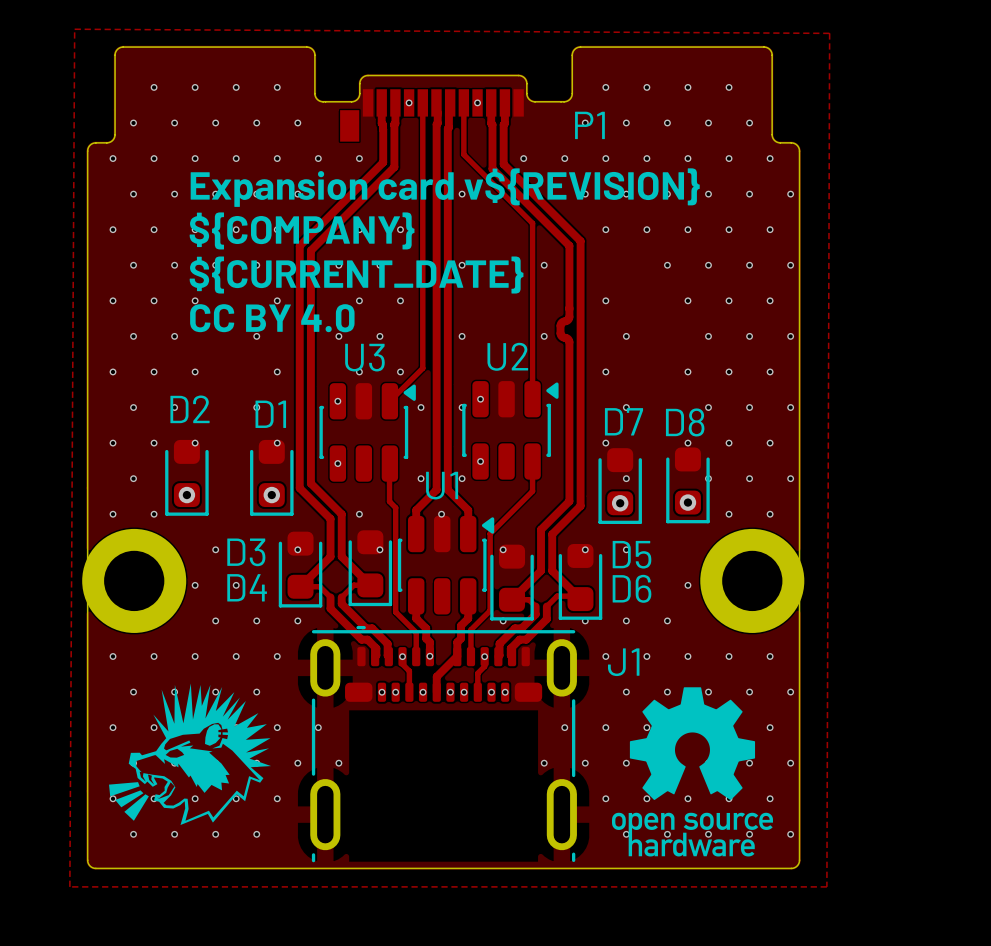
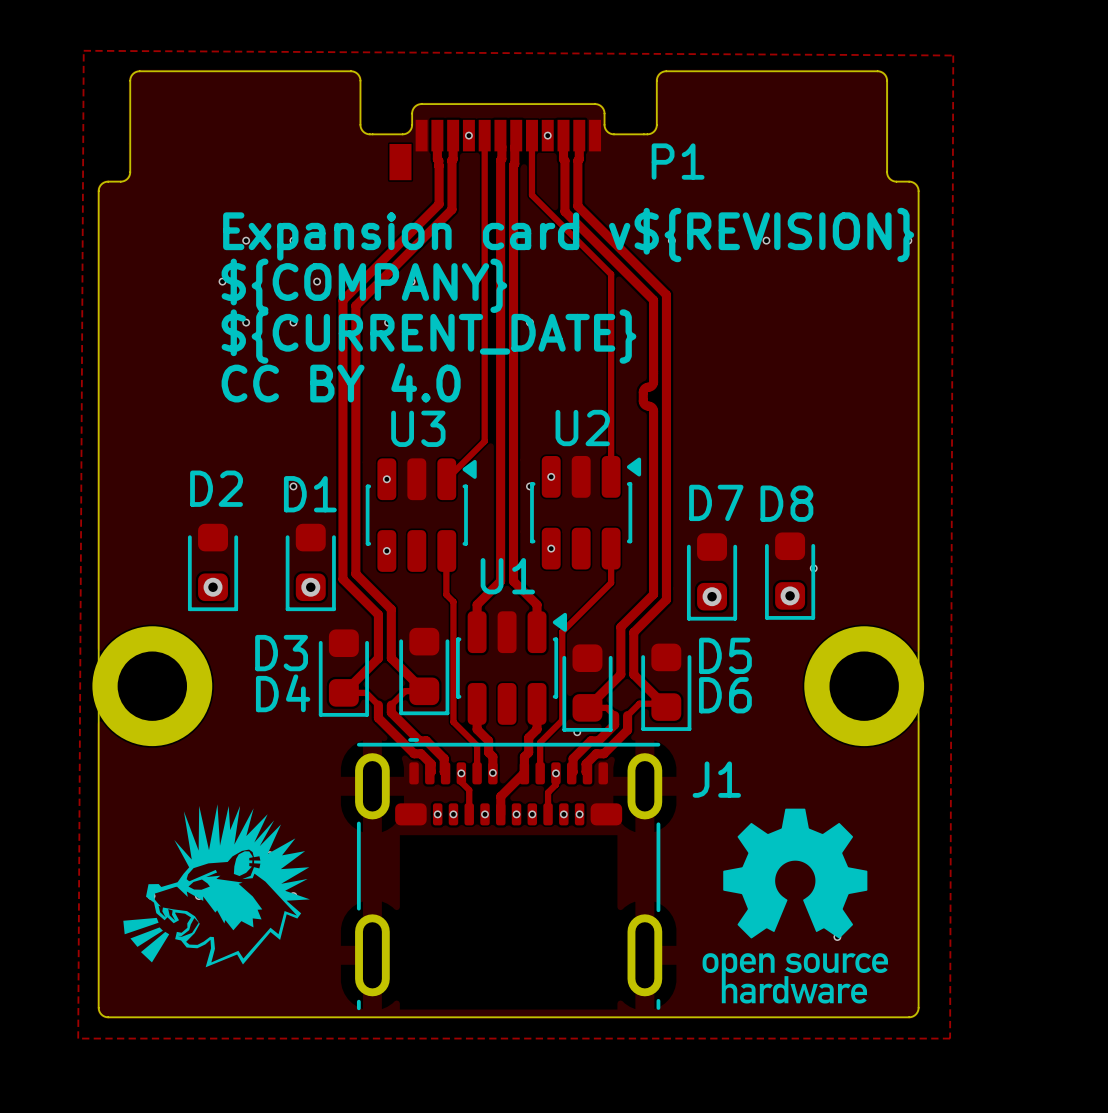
via: (154, 87) -> none
via: (195, 87) -> none
via: (236, 87) -> none
via: (277, 87) -> none
via: (605, 87) -> none
via: (646, 87) -> none
via: (687, 87) -> none
via: (729, 87) -> none
via: (133, 122) -> none
via: (174, 122) -> none
via: (215, 122) -> none
via: (256, 122) -> none
via: (297, 122) -> none
via: (585, 122) -> none
via: (626, 122) -> none
via: (667, 122) -> none
via: (708, 122) -> none
via: (749, 122) -> none
via: (113, 158) -> none
via: (154, 158) -> none
via: (195, 158) -> none
via: (236, 158) -> none
via: (277, 158) -> none
via: (318, 158) -> none
via: (359, 158) -> none
via: (523, 158) -> none
via: (564, 158) -> none
via: (605, 158) -> none
via: (646, 158) -> none
via: (687, 158) -> none
via: (729, 158) -> none
via: (770, 158) -> none
via: (133, 194) -> none
via: (174, 194) -> none
via: (297, 194) -> none
via: (462, 194) -> none
via: (626, 194) -> none
via: (708, 194) -> none
via: (749, 194) -> none
via: (113, 229) -> none
via: (154, 229) -> none
via: (236, 229) -> none
via: (400, 229) -> none
via: (605, 229) -> none
via: (646, 229) -> none
via: (687, 229) -> none
via: (729, 229) -> none
via: (770, 229) -> none
via: (133, 265) -> none
via: (174, 265) -> none
via: (544, 265) -> none
via: (667, 265) -> none
via: (708, 265) -> none
via: (749, 265) -> none
via: (790, 265) -> none
via: (113, 300) -> none
via: (154, 300) -> none
via: (195, 300) -> none
via: (277, 300) -> none
via: (359, 300) -> none
via: (400, 300) -> none
via: (605, 300) -> none
via: (687, 300) -> none
via: (729, 300) -> none
via: (770, 300) -> none
via: (133, 336) -> none
via: (174, 336) -> none
via: (256, 336) -> none
via: (338, 336) -> none
via: (379, 336) -> none
via: (462, 336) -> none
via: (544, 336) -> none
via: (626, 336) -> none
via: (708, 336) -> none
via: (749, 336) -> none
via: (790, 336) -> none
via: (113, 371) -> none
via: (154, 371) -> none
via: (195, 371) -> none
via: (277, 371) -> none
via: (359, 371) -> none
via: (400, 371) -> none
via: (605, 371) -> none
via: (687, 371) -> none
via: (729, 371) -> none
via: (770, 371) -> none
via: (133, 407) -> none
via: (174, 407) -> none
via: (421, 407) -> none
via: (626, 407) -> none
via: (708, 407) -> none
via: (749, 407) -> none
via: (790, 407) -> none
via: (113, 443) -> none
via: (154, 443) -> none
via: (195, 443) -> none
via: (277, 443) -> none
via: (605, 443) -> none
via: (687, 443) -> none
via: (729, 443) -> none
via: (770, 443) -> none
via: (133, 478) -> none
via: (421, 478) -> none
via: (462, 478) -> none
via: (626, 478) -> none
via: (749, 478) -> none
via: (790, 478) -> none
via: (113, 514) -> none
via: (154, 514) -> none
via: (359, 514) -> none
via: (441, 514) -> none
via: (729, 514) -> none
via: (770, 514) -> none
via: (215, 549) -> none
via: (297, 549) -> none
via: (379, 549) -> none
via: (503, 549) -> none
via: (585, 549) -> none
via: (626, 549) -> none
via: (195, 585) -> none
via: (236, 585) -> none
via: (687, 585) -> none
via: (215, 620) -> none
via: (256, 620) -> none
via: (297, 620) -> none
via: (585, 620) -> none
via: (626, 620) -> none
via: (667, 620) -> none
via: (113, 656) -> none
via: (154, 656) -> none
via: (195, 656) -> none
via: (236, 656) -> none
via: (277, 656) -> none
via: (605, 656) -> none
via: (646, 656) -> none
via: (687, 656) -> none
via: (729, 656) -> none
via: (770, 656) -> none
via: (133, 692) -> none
via: (174, 692) -> none
via: (215, 692) -> none
via: (256, 692) -> none
via: (626, 692) -> none
via: (667, 692) -> none
via: (708, 692) -> none
via: (749, 692) -> none
via: (790, 692) -> none
via: (113, 727) -> none
via: (154, 727) -> none
via: (277, 727) -> none
via: (318, 727) -> none
via: (564, 727) -> none
via: (605, 727) -> none
via: (646, 727) -> none
via: (770, 727) -> none
via: (297, 763) -> none
via: (338, 763) -> none
via: (544, 763) -> none
via: (585, 763) -> none
via: (626, 763) -> none
via: (749, 763) -> none
via: (790, 763) -> none
via: (113, 798) -> none
via: (154, 798) -> none
via: (195, 798) -> none
via: (236, 798) -> none
via: (277, 798) -> none
via: (605, 798) -> none
via: (646, 798) -> none
via: (687, 798) -> none
via: (770, 798) -> none
via: (133, 834) -> none
via: (174, 834) -> none
via: (215, 834) -> none
via: (256, 834) -> none
via: (626, 834) -> none
via: (667, 834) -> none
via: (708, 834) -> none
via: (749, 834) -> none
via: (790, 834) -> none

